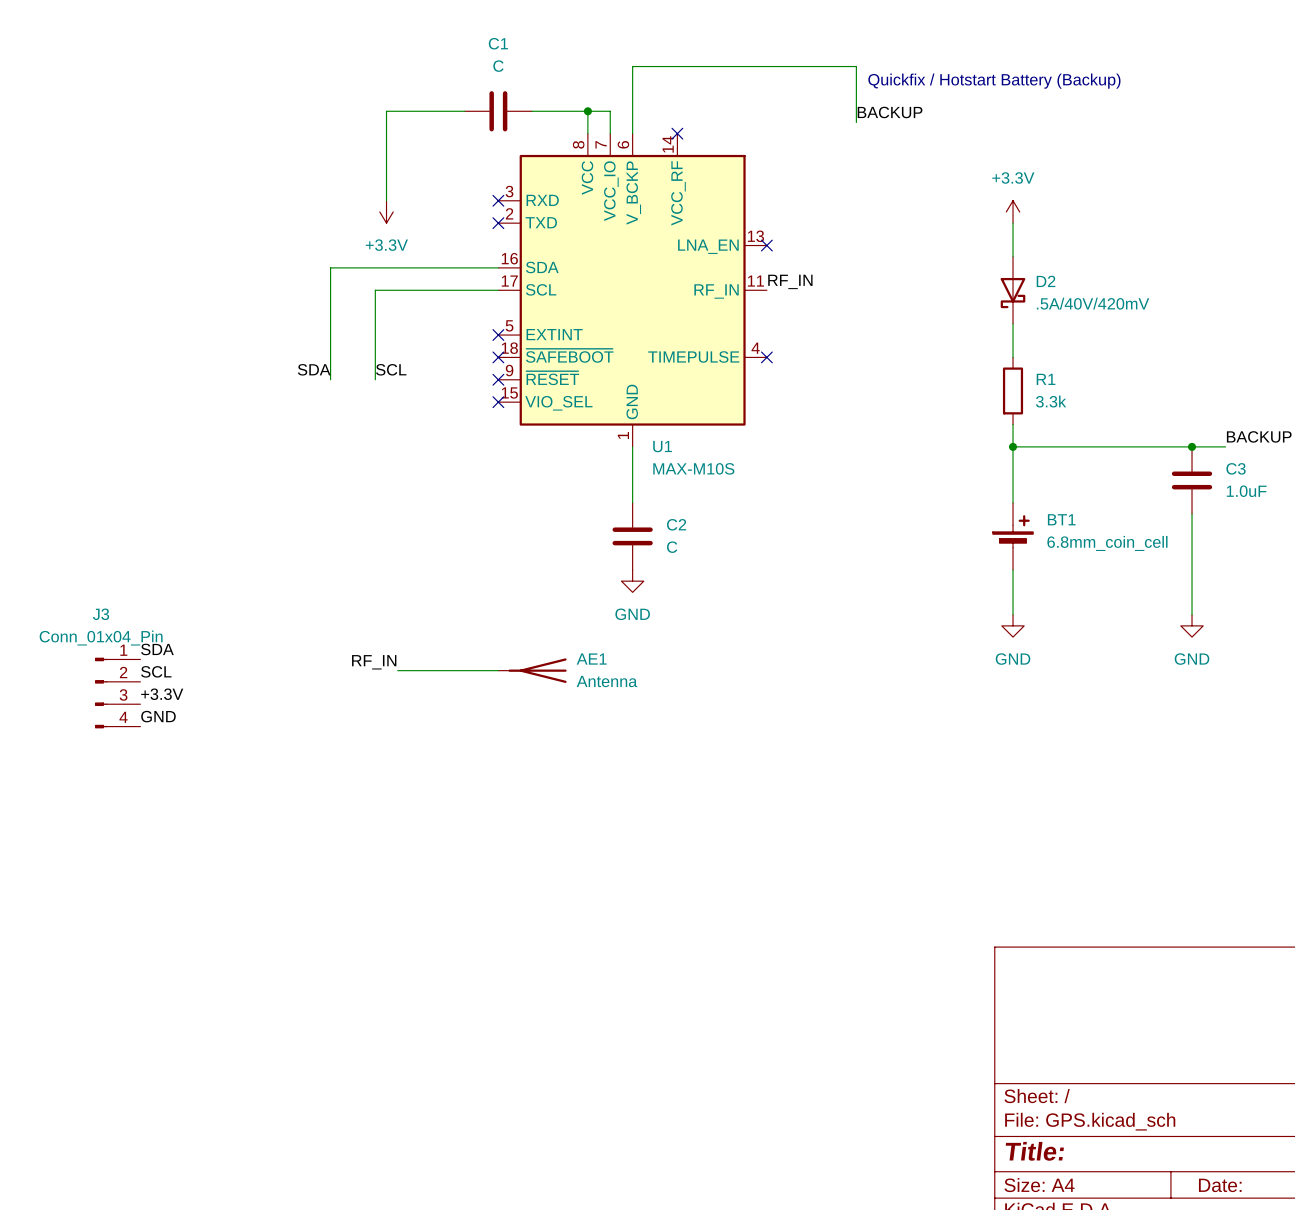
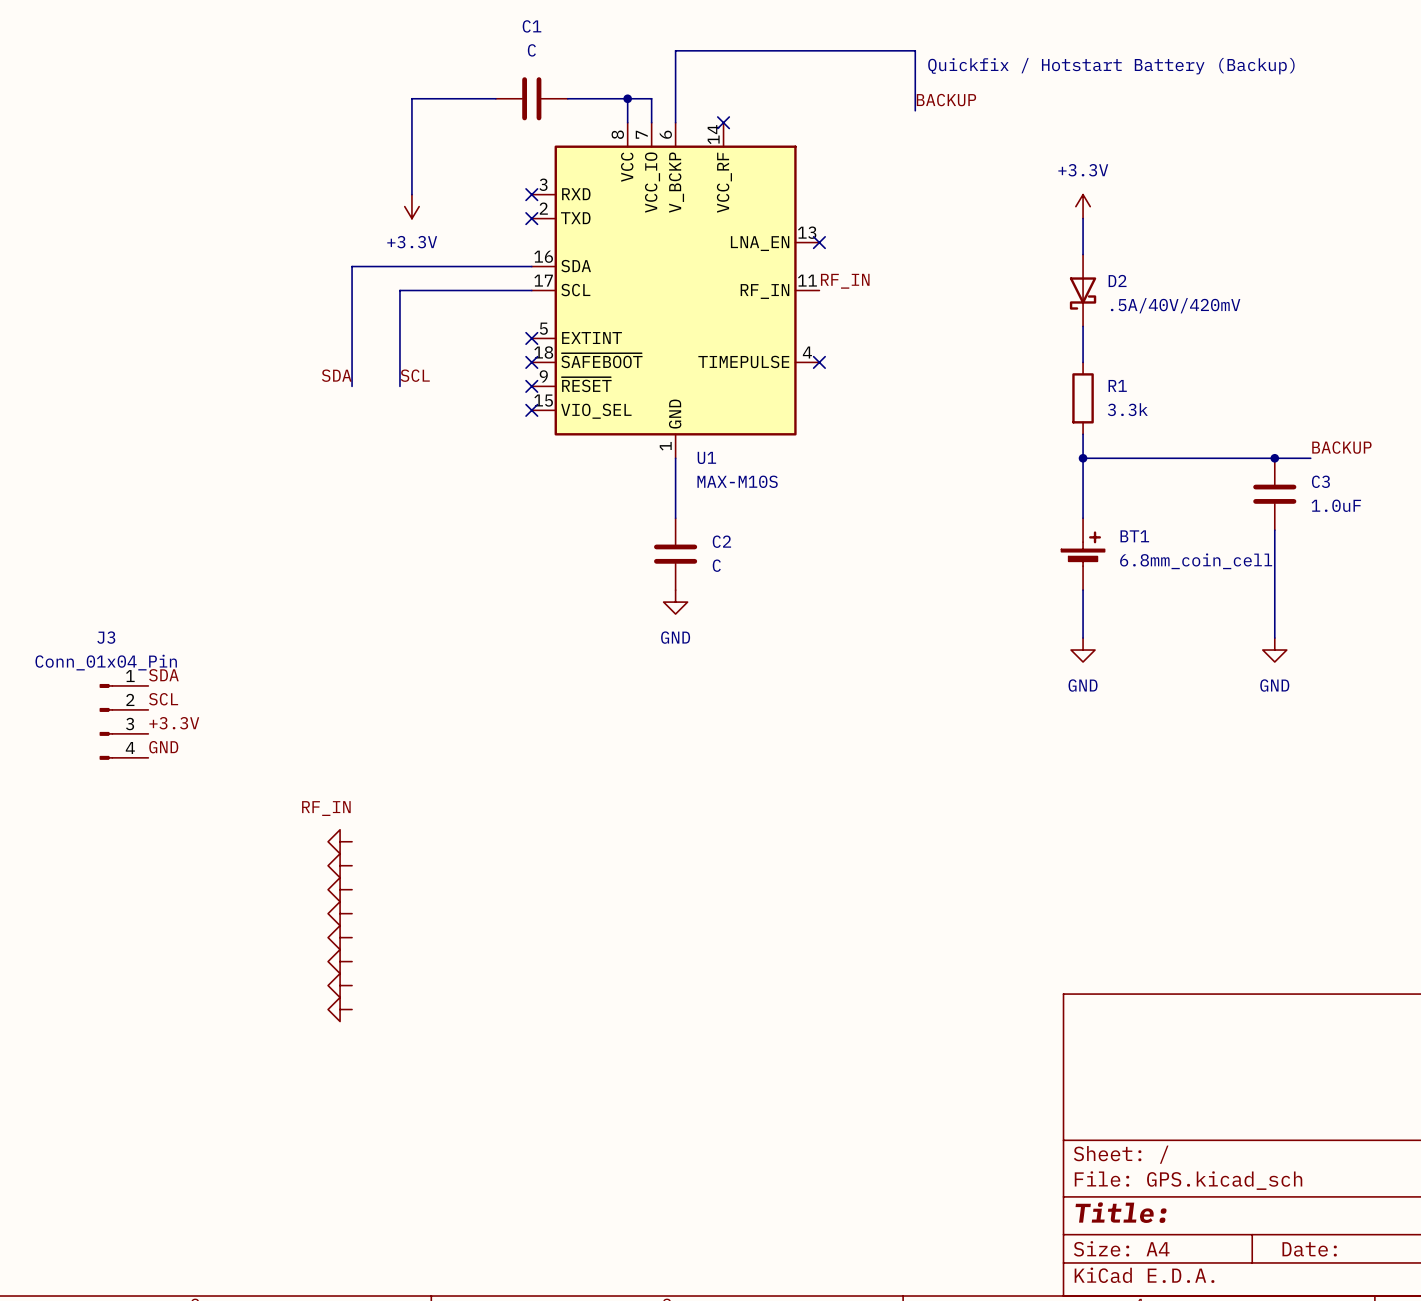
label position: RF_IN (374, 662) -> RF_IN (326, 808)
wire: (397, 670) (498, 670) -> none
AE1: Antenna (532, 670) -> none
power symbol: none -> (340, 841)
power symbol: none -> (340, 865)
power symbol: none -> (340, 889)
power symbol: none -> (340, 913)
power symbol: none -> (340, 937)
power symbol: none -> (340, 961)
power symbol: none -> (340, 985)
power symbol: none -> (340, 1009)

